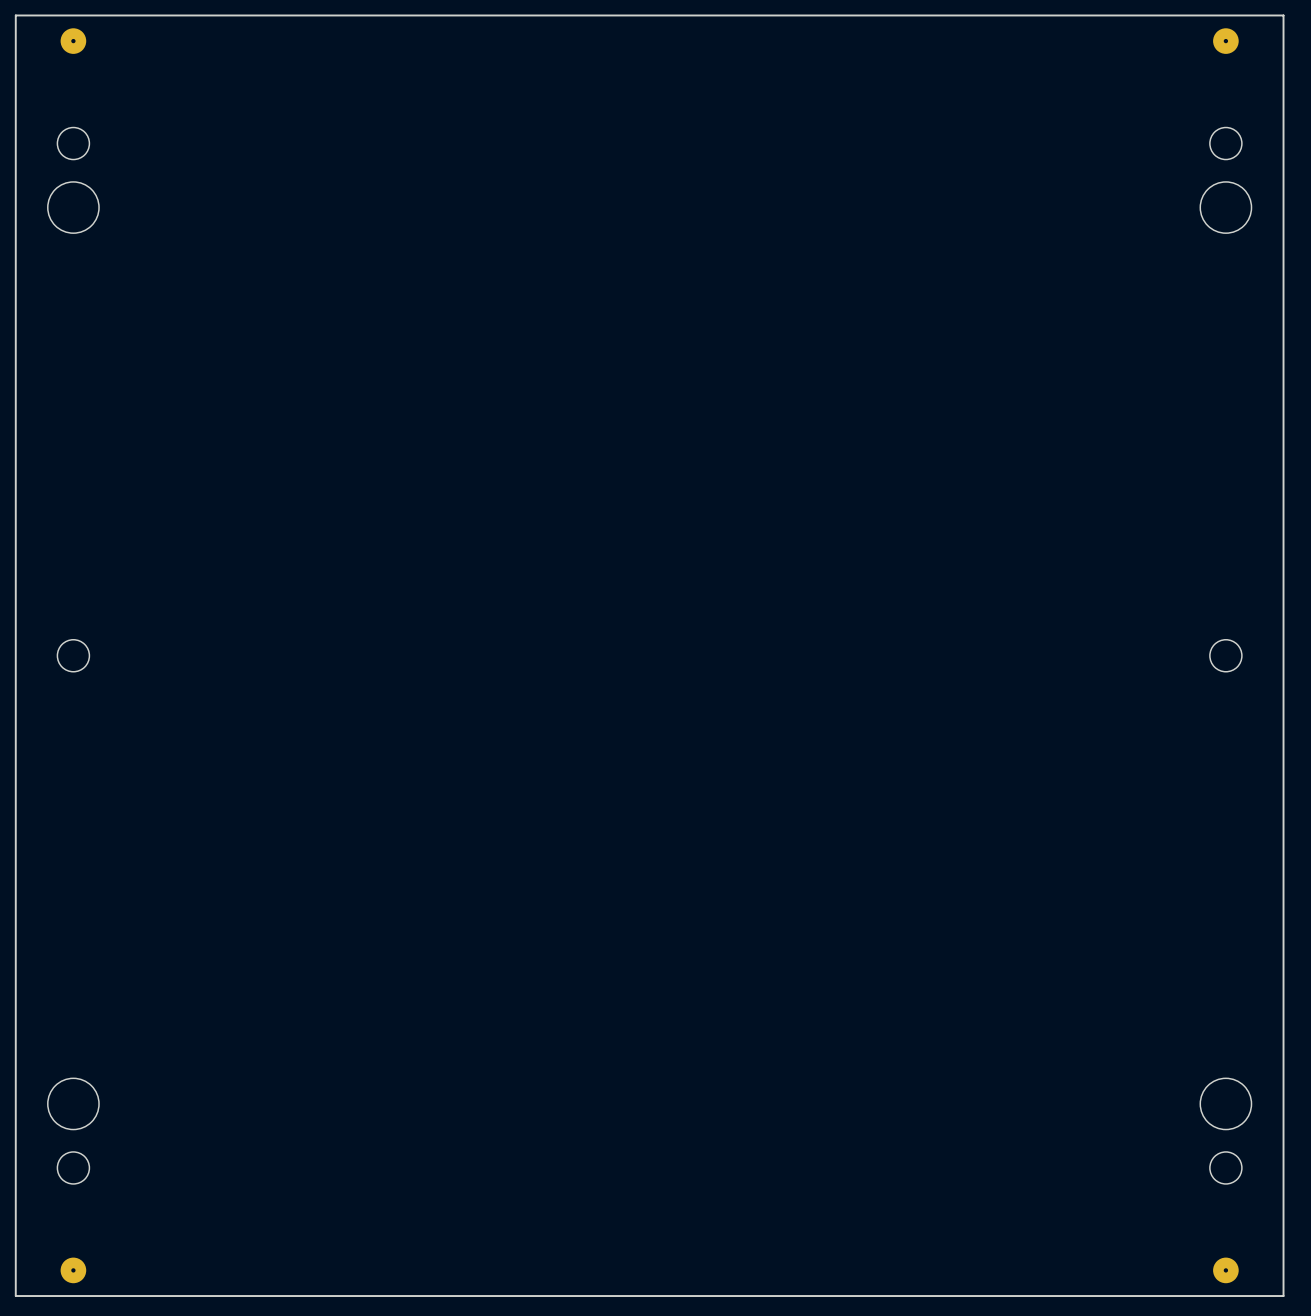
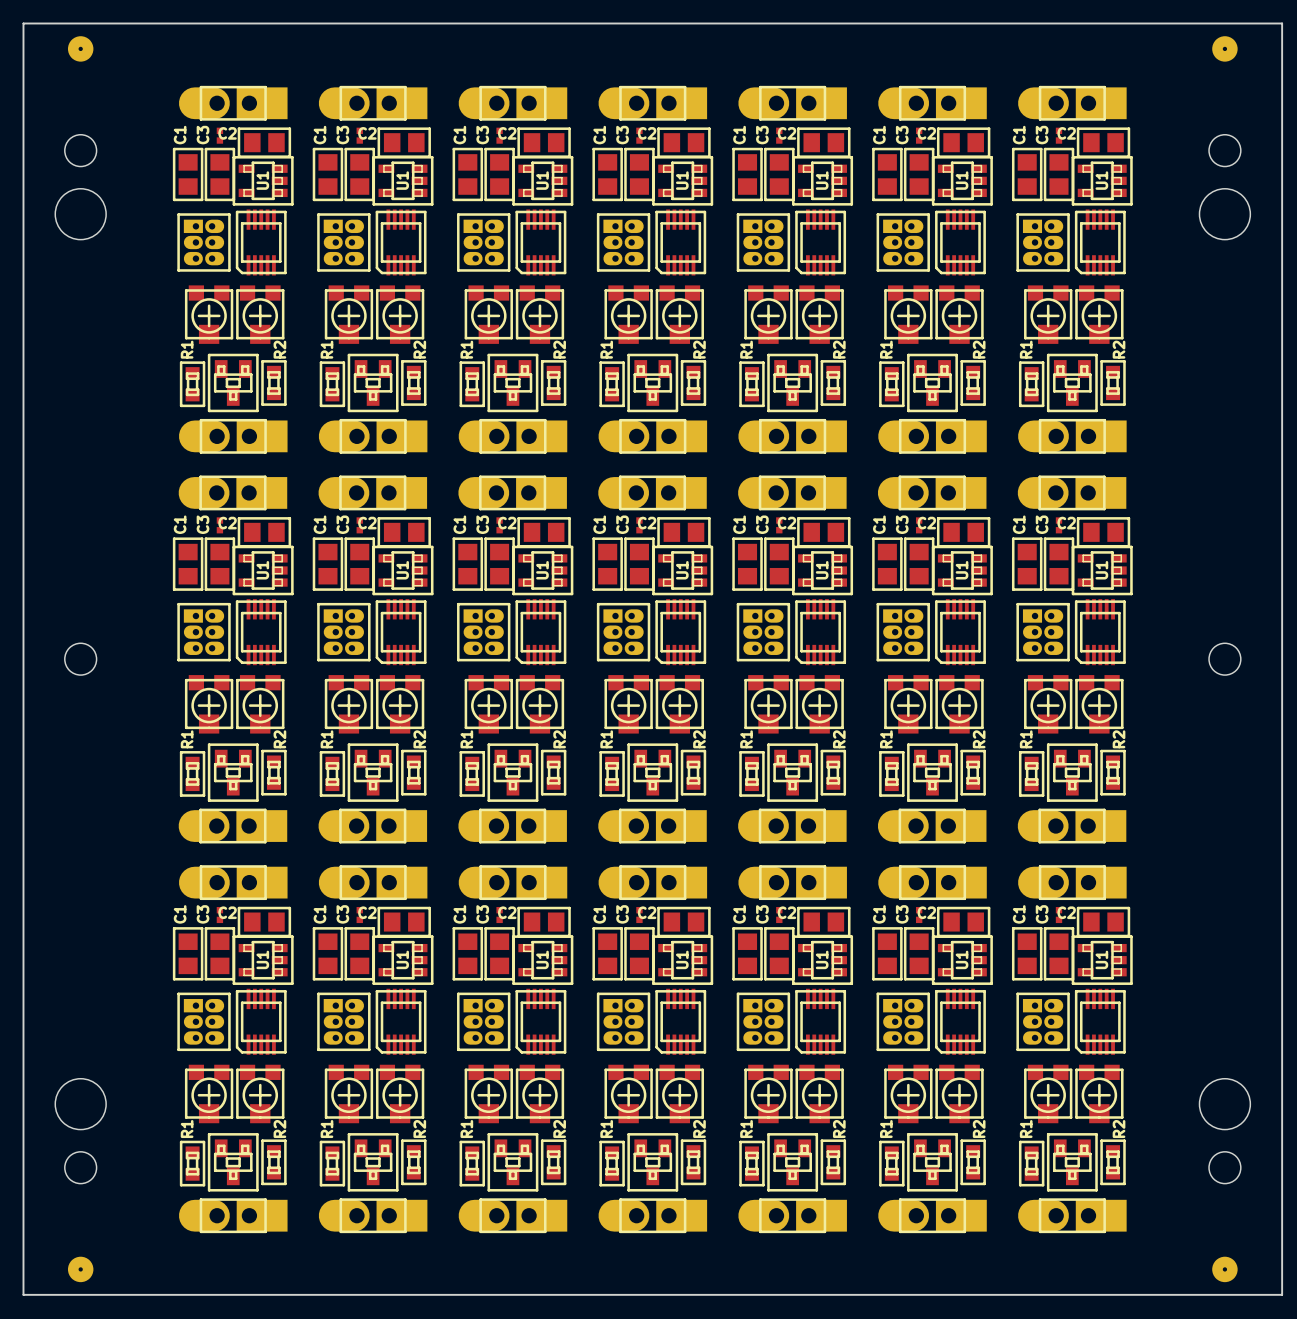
part: none -> (233, 103)
part: none -> (373, 103)
part: none -> (512, 103)
part: none -> (652, 103)
part: none -> (792, 103)
part: none -> (932, 103)
part: none -> (1072, 103)
part: none -> (219, 135)
part: none -> (359, 135)
part: none -> (499, 135)
part: none -> (639, 135)
part: none -> (779, 135)
part: none -> (919, 135)
part: none -> (1059, 135)
C2: none -> (264, 142)
C2: none -> (404, 142)
C2: none -> (544, 142)
C2: none -> (683, 142)
C2: none -> (823, 142)
C2: none -> (963, 142)
C2: none -> (1103, 142)
C1: none -> (188, 174)
C3: none -> (219, 174)
C1: none -> (327, 174)
C3: none -> (359, 174)
C1: none -> (467, 174)
C3: none -> (499, 174)
C1: none -> (607, 174)
C3: none -> (639, 174)
C1: none -> (747, 174)
C3: none -> (779, 174)
C1: none -> (887, 174)
C3: none -> (919, 174)
C1: none -> (1027, 174)
C3: none -> (1059, 174)
U1: none -> (263, 180)
U1: none -> (402, 180)
U1: none -> (542, 180)
U1: none -> (682, 180)
U1: none -> (822, 180)
U1: none -> (962, 180)
U1: none -> (1102, 180)
part: none -> (204, 242)
part: none -> (261, 242)
part: none -> (343, 242)
part: none -> (401, 242)
part: none -> (483, 242)
part: none -> (540, 242)
part: none -> (623, 242)
part: none -> (680, 242)
part: none -> (763, 242)
part: none -> (820, 242)
part: none -> (903, 242)
part: none -> (960, 242)
part: none -> (1043, 242)
part: none -> (1100, 242)
part: none -> (209, 314)
part: none -> (260, 314)
part: none -> (348, 314)
part: none -> (400, 314)
part: none -> (488, 314)
part: none -> (539, 314)
part: none -> (628, 314)
part: none -> (679, 314)
part: none -> (768, 314)
part: none -> (819, 314)
part: none -> (908, 314)
part: none -> (959, 314)
part: none -> (1048, 314)
part: none -> (1099, 314)
part: none -> (233, 382)
R2: none -> (273, 382)
part: none -> (373, 382)
R2: none -> (413, 382)
part: none -> (512, 382)
R2: none -> (553, 382)
part: none -> (652, 382)
R2: none -> (693, 382)
part: none -> (792, 382)
R2: none -> (833, 382)
part: none -> (932, 382)
R2: none -> (973, 382)
part: none -> (1072, 382)
R2: none -> (1113, 382)
R1: none -> (192, 384)
R1: none -> (332, 384)
R1: none -> (472, 384)
R1: none -> (612, 384)
R1: none -> (751, 384)
R1: none -> (891, 384)
R1: none -> (1031, 384)
part: none -> (233, 436)
part: none -> (373, 436)
part: none -> (512, 436)
part: none -> (652, 436)
part: none -> (792, 436)
part: none -> (932, 436)
part: none -> (1072, 436)
part: none -> (232, 492)
part: none -> (372, 492)
part: none -> (512, 492)
part: none -> (652, 492)
part: none -> (792, 492)
part: none -> (932, 492)
part: none -> (1072, 492)
part: none -> (219, 525)
part: none -> (359, 525)
part: none -> (499, 525)
part: none -> (639, 525)
part: none -> (779, 525)
part: none -> (919, 525)
part: none -> (1059, 525)
C2: none -> (264, 532)
C2: none -> (404, 532)
C2: none -> (544, 532)
C2: none -> (683, 532)
C2: none -> (823, 532)
C2: none -> (963, 532)
C2: none -> (1103, 532)
C1: none -> (188, 564)
C3: none -> (219, 564)
C1: none -> (327, 564)
C3: none -> (359, 564)
C1: none -> (467, 564)
C3: none -> (499, 564)
C1: none -> (607, 564)
C3: none -> (639, 564)
C1: none -> (747, 564)
C3: none -> (779, 564)
C1: none -> (887, 564)
C3: none -> (919, 564)
C1: none -> (1027, 564)
C3: none -> (1059, 564)
U1: none -> (263, 570)
U1: none -> (402, 570)
U1: none -> (542, 570)
U1: none -> (682, 570)
U1: none -> (822, 570)
U1: none -> (962, 570)
U1: none -> (1102, 570)
part: none -> (204, 632)
part: none -> (261, 632)
part: none -> (343, 632)
part: none -> (401, 632)
part: none -> (483, 632)
part: none -> (540, 632)
part: none -> (623, 632)
part: none -> (680, 632)
part: none -> (763, 632)
part: none -> (820, 632)
part: none -> (903, 632)
part: none -> (960, 632)
part: none -> (1043, 632)
part: none -> (1100, 632)
part: none -> (209, 704)
part: none -> (260, 704)
part: none -> (348, 704)
part: none -> (400, 704)
part: none -> (488, 704)
part: none -> (539, 704)
part: none -> (628, 704)
part: none -> (679, 704)
part: none -> (768, 704)
part: none -> (819, 704)
part: none -> (908, 704)
part: none -> (959, 704)
part: none -> (1048, 704)
part: none -> (1099, 704)
part: none -> (233, 772)
R2: none -> (273, 772)
part: none -> (373, 772)
R2: none -> (413, 772)
part: none -> (512, 772)
R2: none -> (553, 772)
part: none -> (652, 772)
R2: none -> (693, 772)
part: none -> (792, 772)
R2: none -> (833, 772)
part: none -> (932, 772)
R2: none -> (973, 772)
part: none -> (1072, 772)
R2: none -> (1113, 772)
R1: none -> (192, 773)
R1: none -> (332, 773)
R1: none -> (472, 773)
R1: none -> (612, 773)
R1: none -> (751, 773)
R1: none -> (891, 773)
R1: none -> (1031, 773)
part: none -> (232, 826)
part: none -> (372, 826)
part: none -> (512, 826)
part: none -> (652, 826)
part: none -> (792, 826)
part: none -> (932, 826)
part: none -> (1072, 826)
part: none -> (233, 882)
part: none -> (373, 882)
part: none -> (512, 882)
part: none -> (652, 882)
part: none -> (792, 882)
part: none -> (932, 882)
part: none -> (1072, 882)
part: none -> (219, 915)
part: none -> (359, 915)
part: none -> (499, 915)
part: none -> (639, 915)
part: none -> (779, 915)
part: none -> (919, 915)
part: none -> (1059, 915)
C2: none -> (264, 922)
C2: none -> (404, 922)
C2: none -> (544, 922)
C2: none -> (683, 922)
C2: none -> (823, 922)
C2: none -> (963, 922)
C2: none -> (1103, 922)
C1: none -> (188, 953)
C3: none -> (219, 953)
C1: none -> (327, 953)
C3: none -> (359, 953)
C1: none -> (467, 953)
C3: none -> (499, 953)
C1: none -> (607, 953)
C3: none -> (639, 953)
C1: none -> (747, 953)
C3: none -> (779, 953)
C1: none -> (887, 953)
C3: none -> (919, 953)
C1: none -> (1027, 953)
C3: none -> (1059, 953)
U1: none -> (263, 960)
U1: none -> (402, 960)
U1: none -> (542, 960)
U1: none -> (682, 960)
U1: none -> (822, 960)
U1: none -> (962, 960)
U1: none -> (1102, 960)
part: none -> (204, 1021)
part: none -> (261, 1021)
part: none -> (343, 1021)
part: none -> (401, 1021)
part: none -> (483, 1021)
part: none -> (540, 1021)
part: none -> (623, 1021)
part: none -> (680, 1021)
part: none -> (763, 1021)
part: none -> (820, 1021)
part: none -> (903, 1021)
part: none -> (960, 1021)
part: none -> (1043, 1021)
part: none -> (1100, 1021)
part: none -> (209, 1093)
part: none -> (260, 1093)
part: none -> (348, 1093)
part: none -> (400, 1093)
part: none -> (488, 1093)
part: none -> (539, 1093)
part: none -> (628, 1093)
part: none -> (679, 1093)
part: none -> (768, 1093)
part: none -> (819, 1093)
part: none -> (908, 1093)
part: none -> (959, 1093)
part: none -> (1048, 1093)
part: none -> (1099, 1093)
part: none -> (233, 1162)
R2: none -> (273, 1162)
part: none -> (373, 1162)
R2: none -> (413, 1162)
part: none -> (512, 1162)
R2: none -> (553, 1162)
part: none -> (652, 1162)
R2: none -> (693, 1162)
part: none -> (792, 1162)
R2: none -> (833, 1162)
part: none -> (932, 1162)
R2: none -> (973, 1162)
part: none -> (1072, 1162)
R2: none -> (1113, 1162)
R1: none -> (192, 1163)
R1: none -> (332, 1163)
R1: none -> (472, 1163)
R1: none -> (612, 1163)
R1: none -> (751, 1163)
R1: none -> (891, 1163)
R1: none -> (1031, 1163)
part: none -> (233, 1215)
part: none -> (373, 1215)
part: none -> (512, 1215)
part: none -> (652, 1215)
part: none -> (792, 1215)
part: none -> (932, 1215)
part: none -> (1072, 1215)

